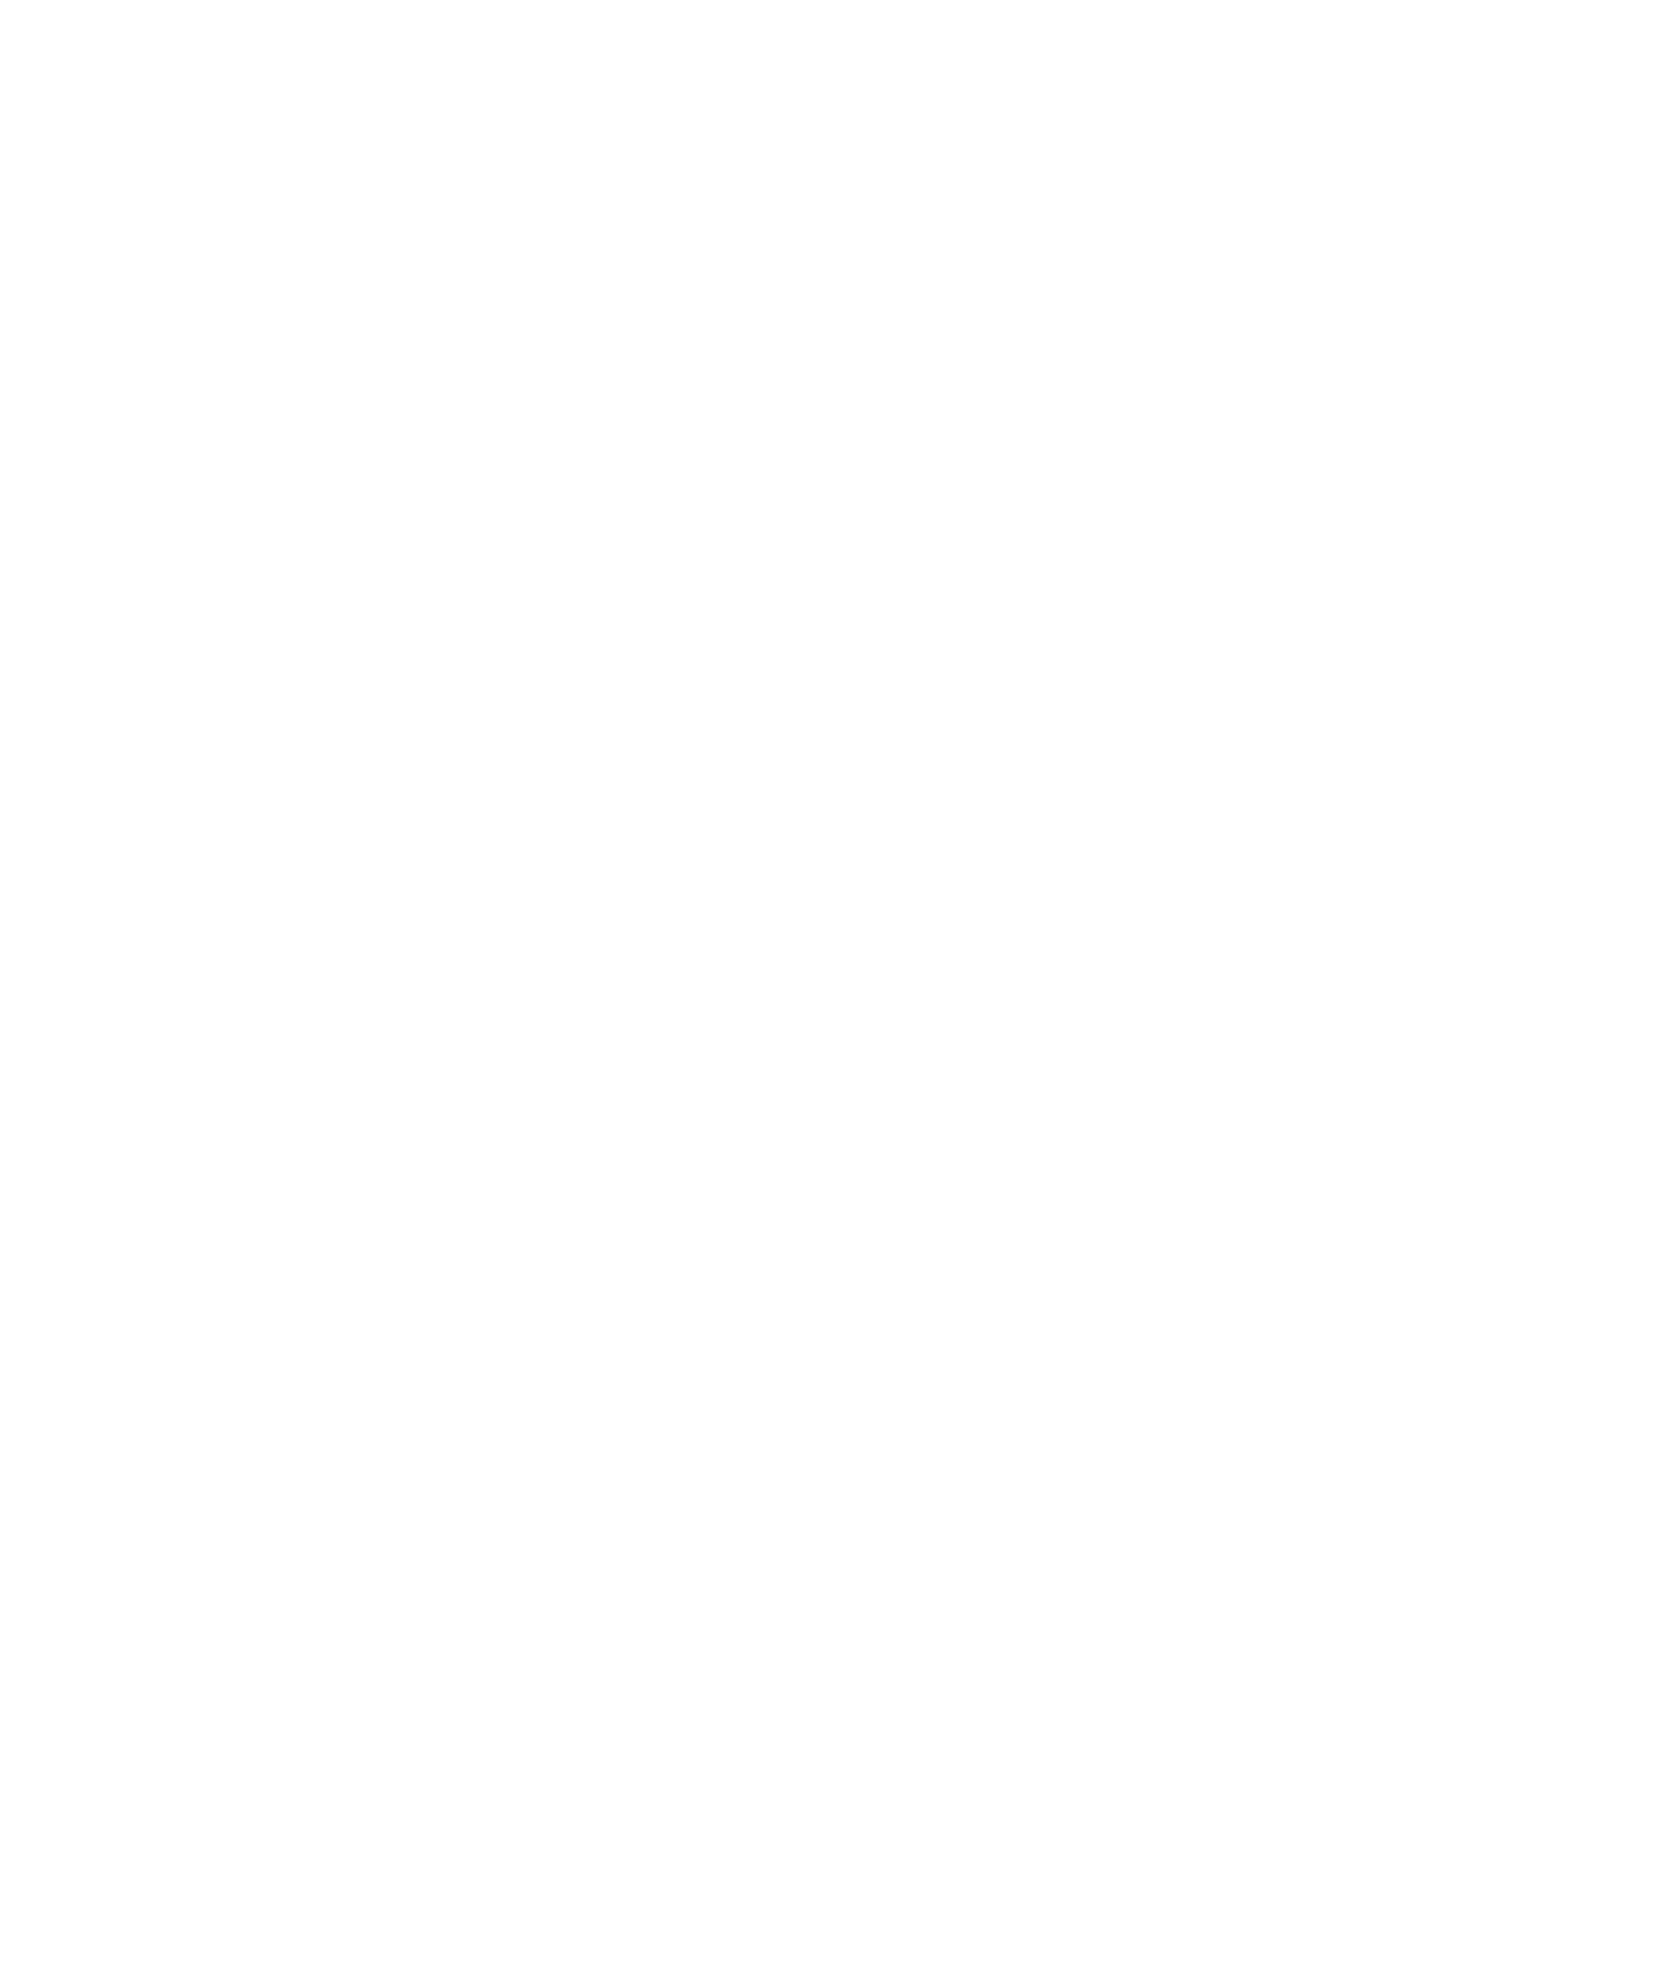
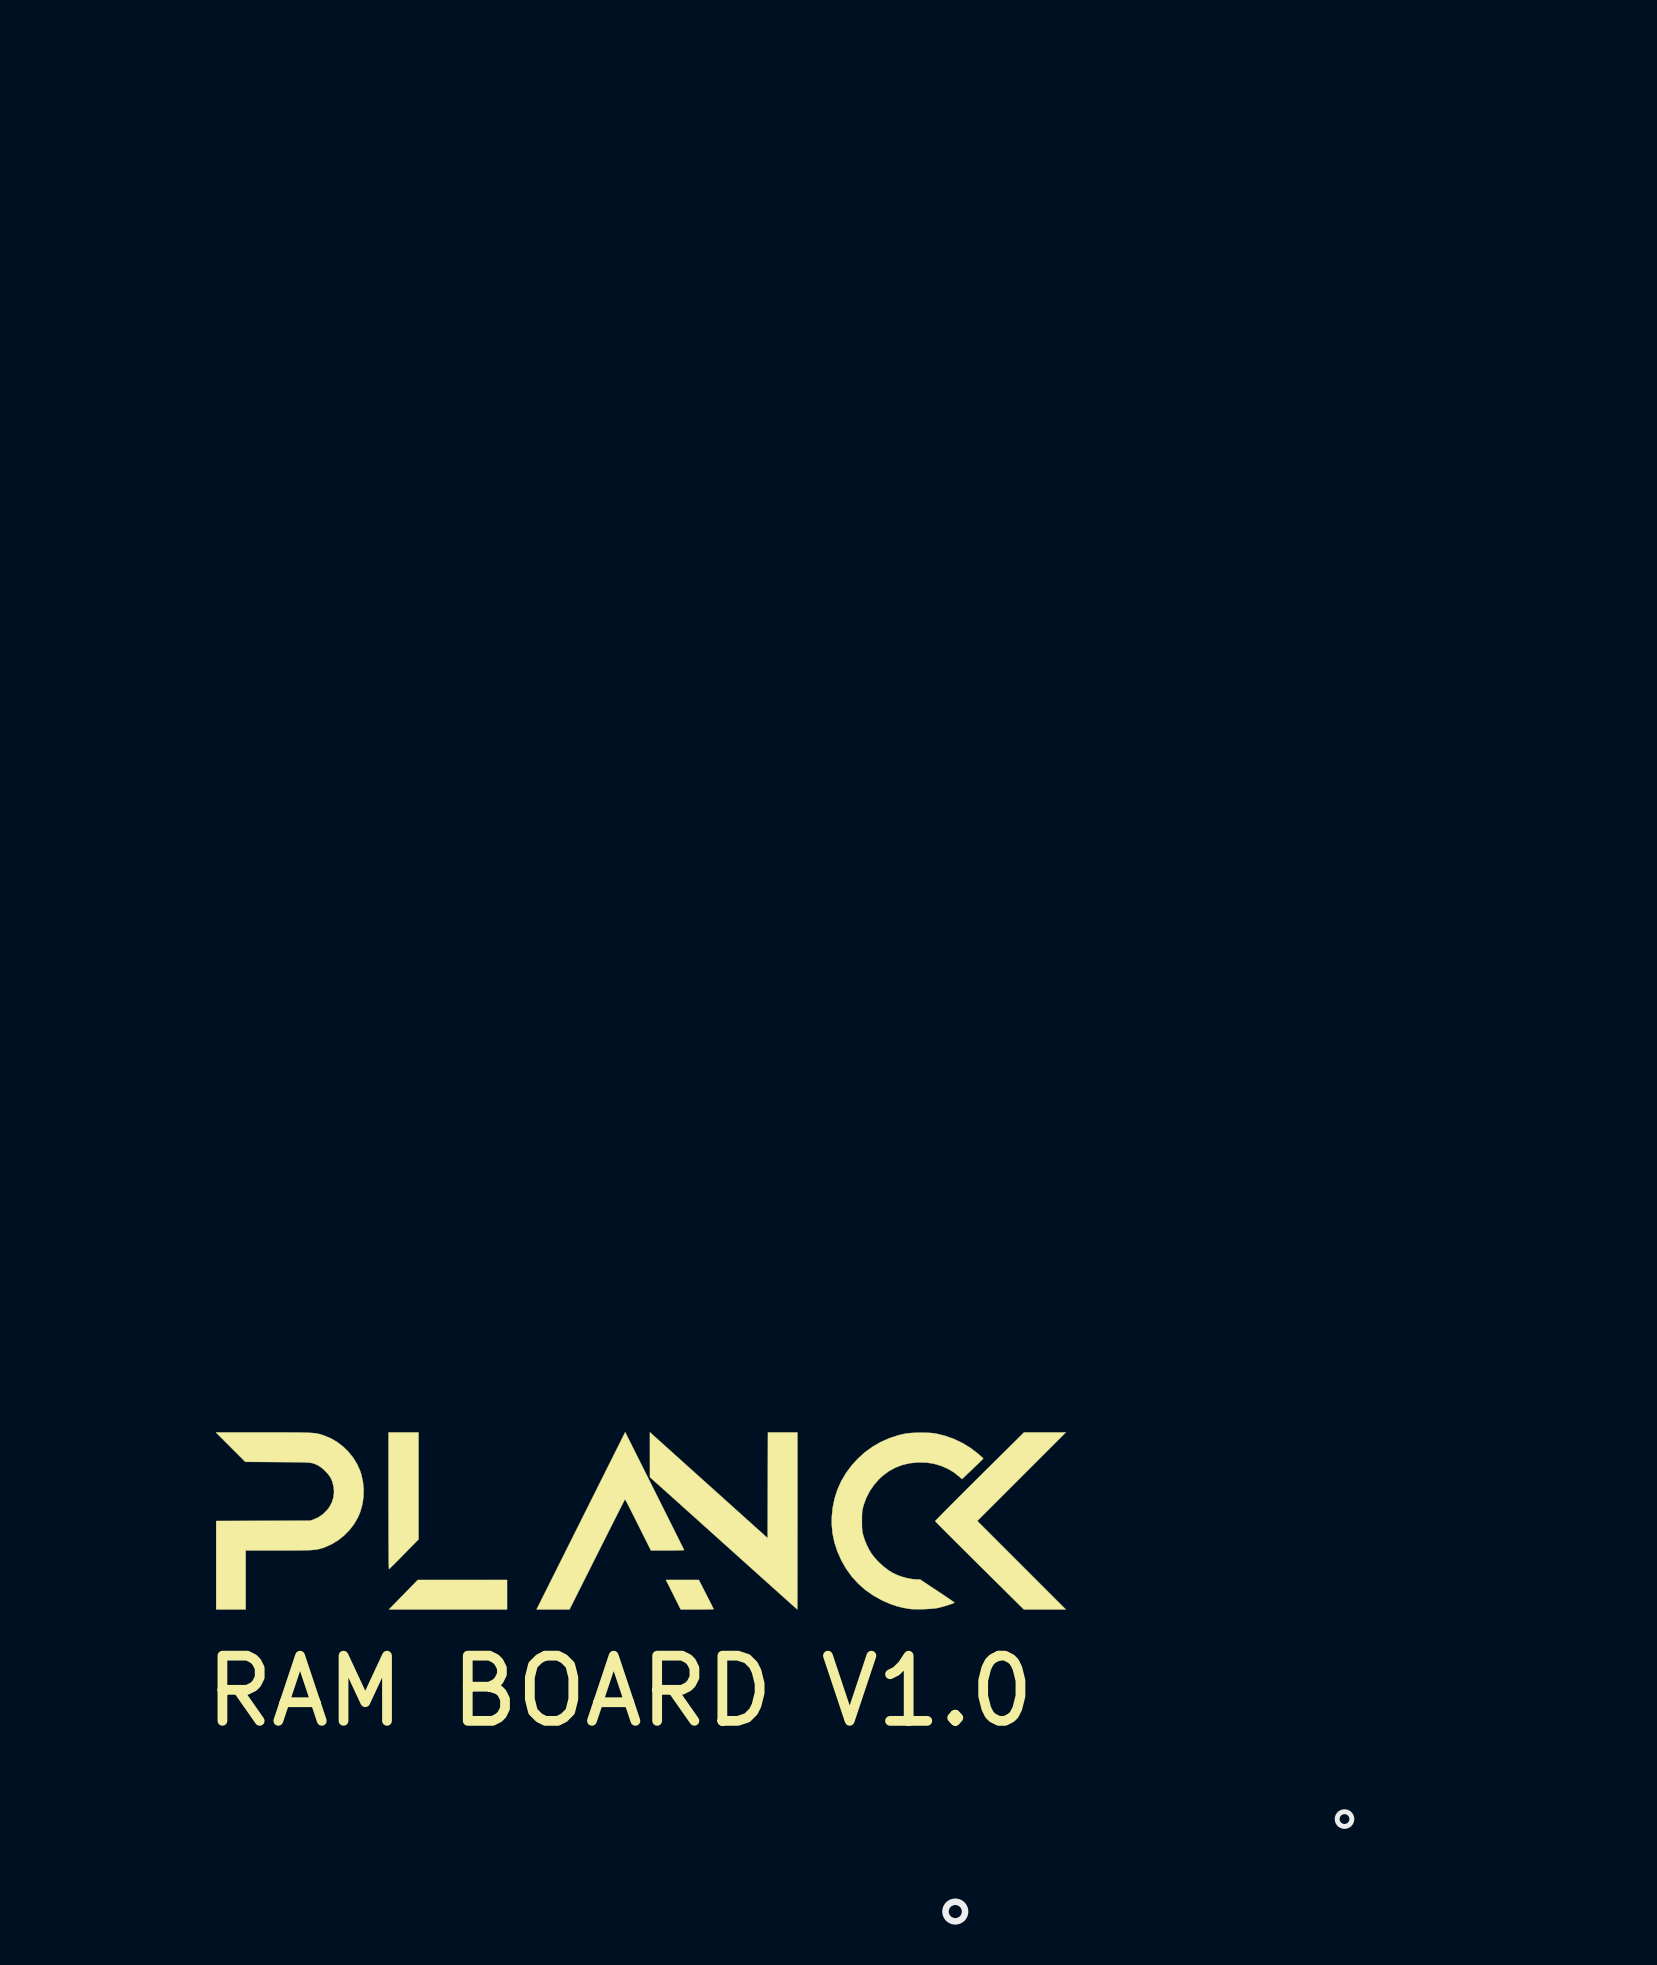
drawing: none -> [215, 1432, 1066, 1610]
text: none -> RAM BOARD V1.0 (621, 1688)
via: none -> (1344, 1819)
via: none -> (955, 1911)

